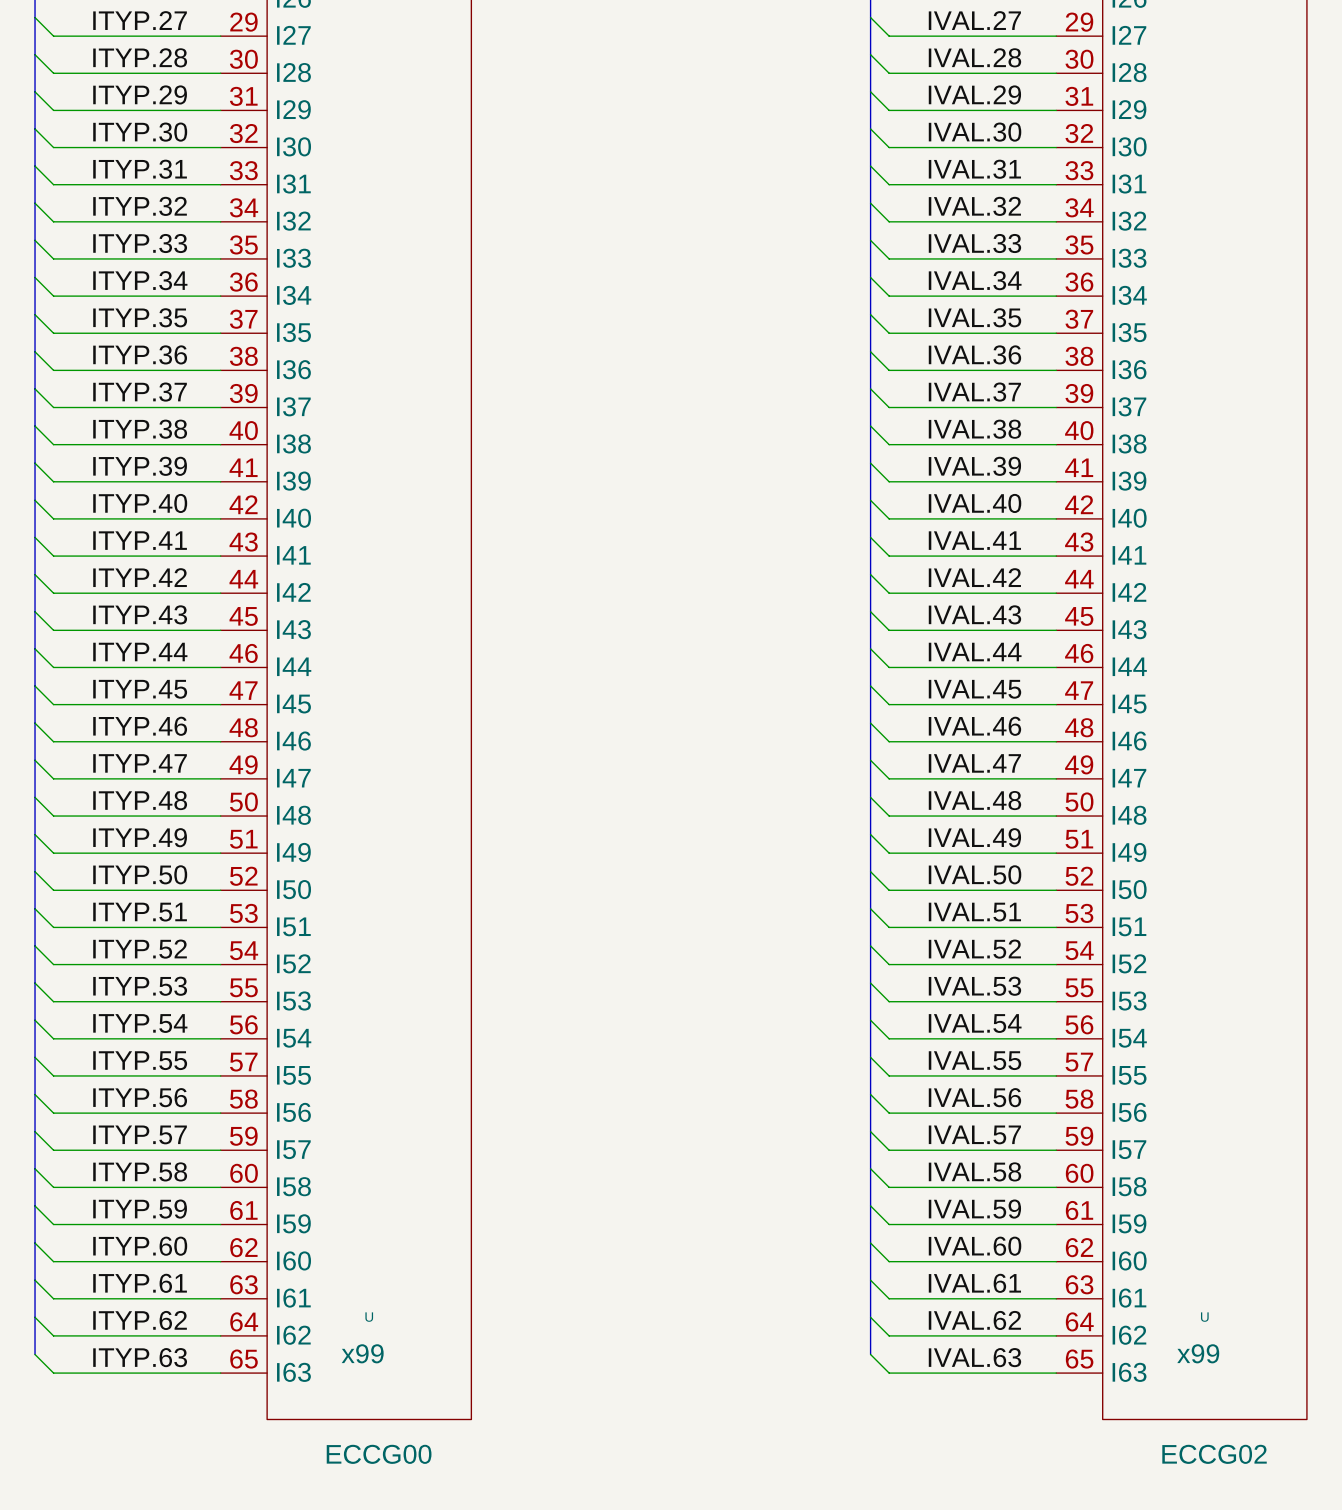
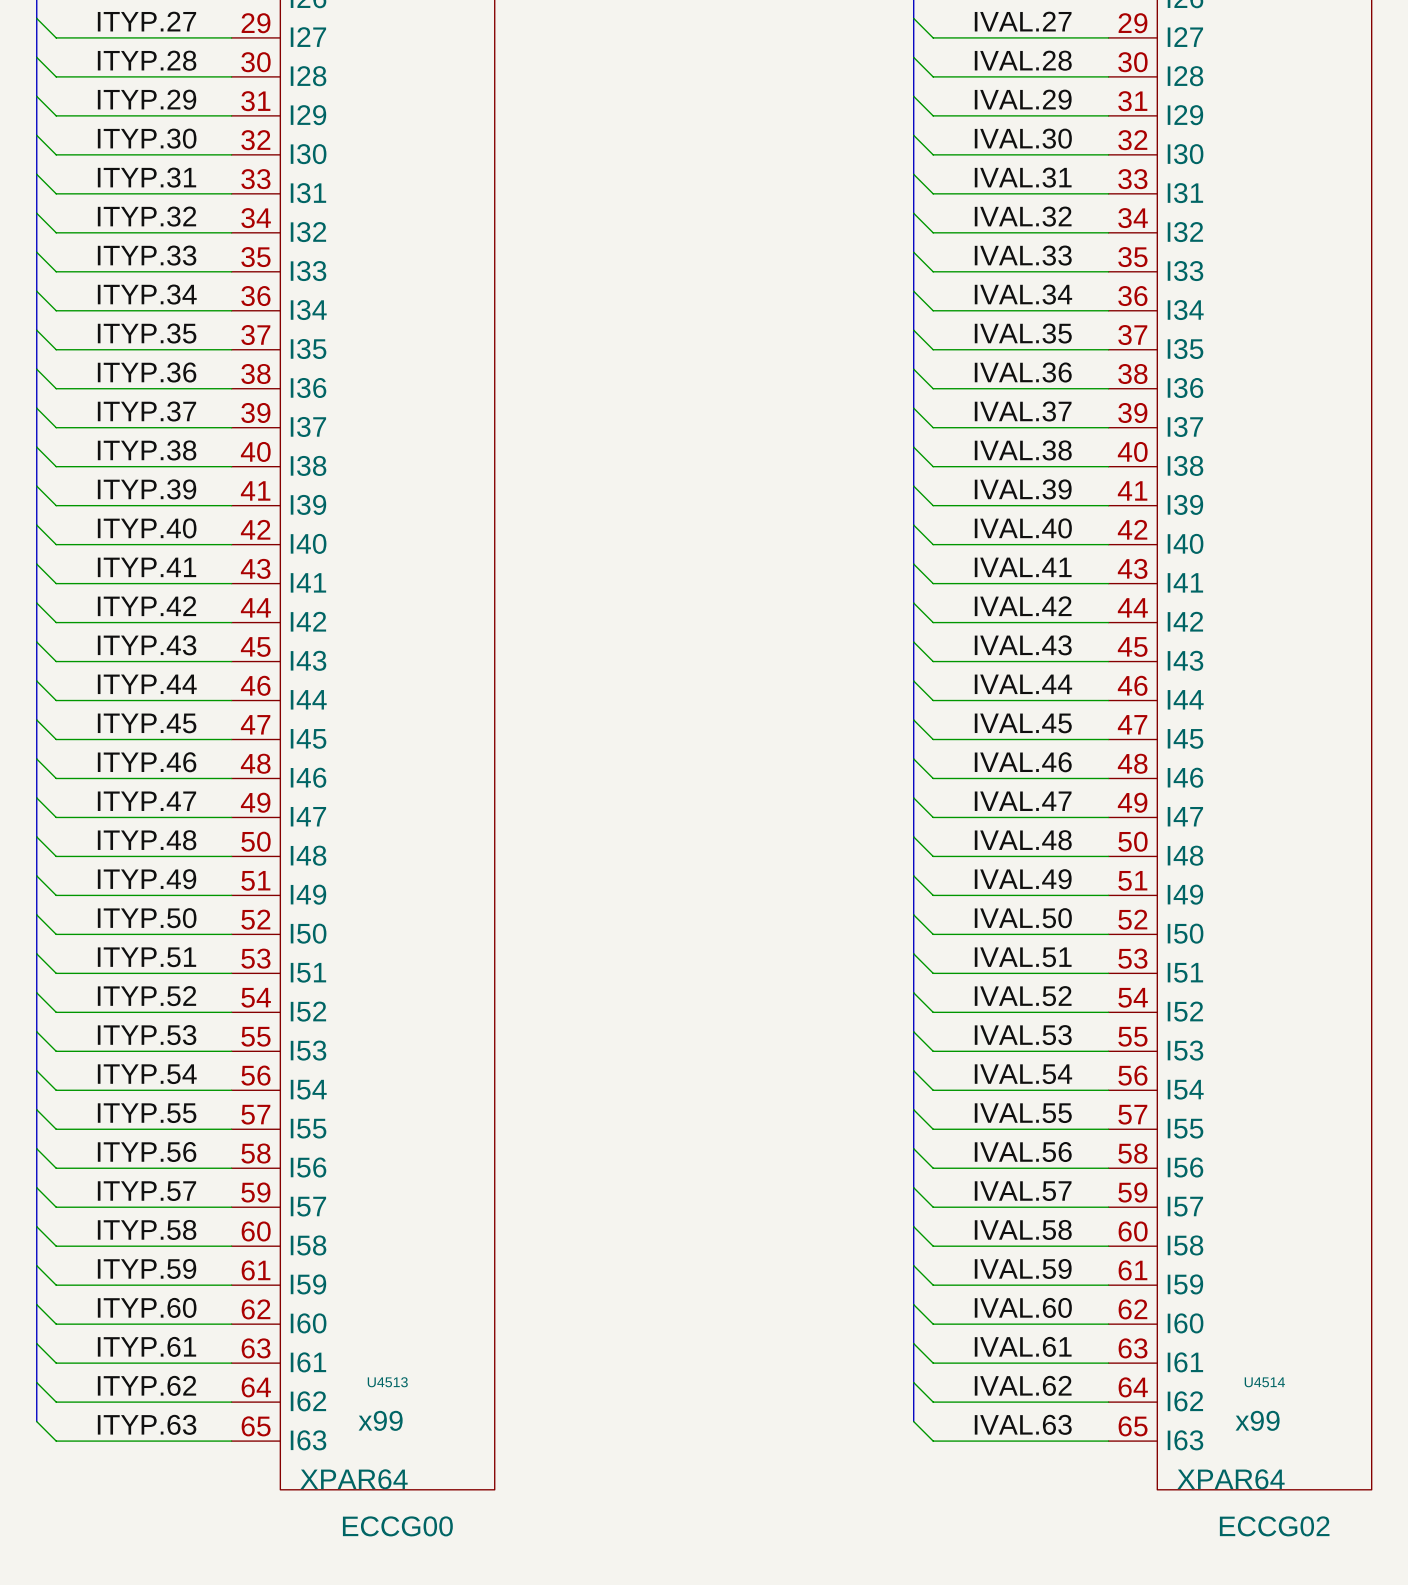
U name: U (369, 1317) -> U4513 (387, 1382)
U name: U (1204, 1317) -> U4514 (1264, 1382)
U value: none -> XPAR64 (354, 1479)
U value: none -> XPAR64 (1231, 1479)

